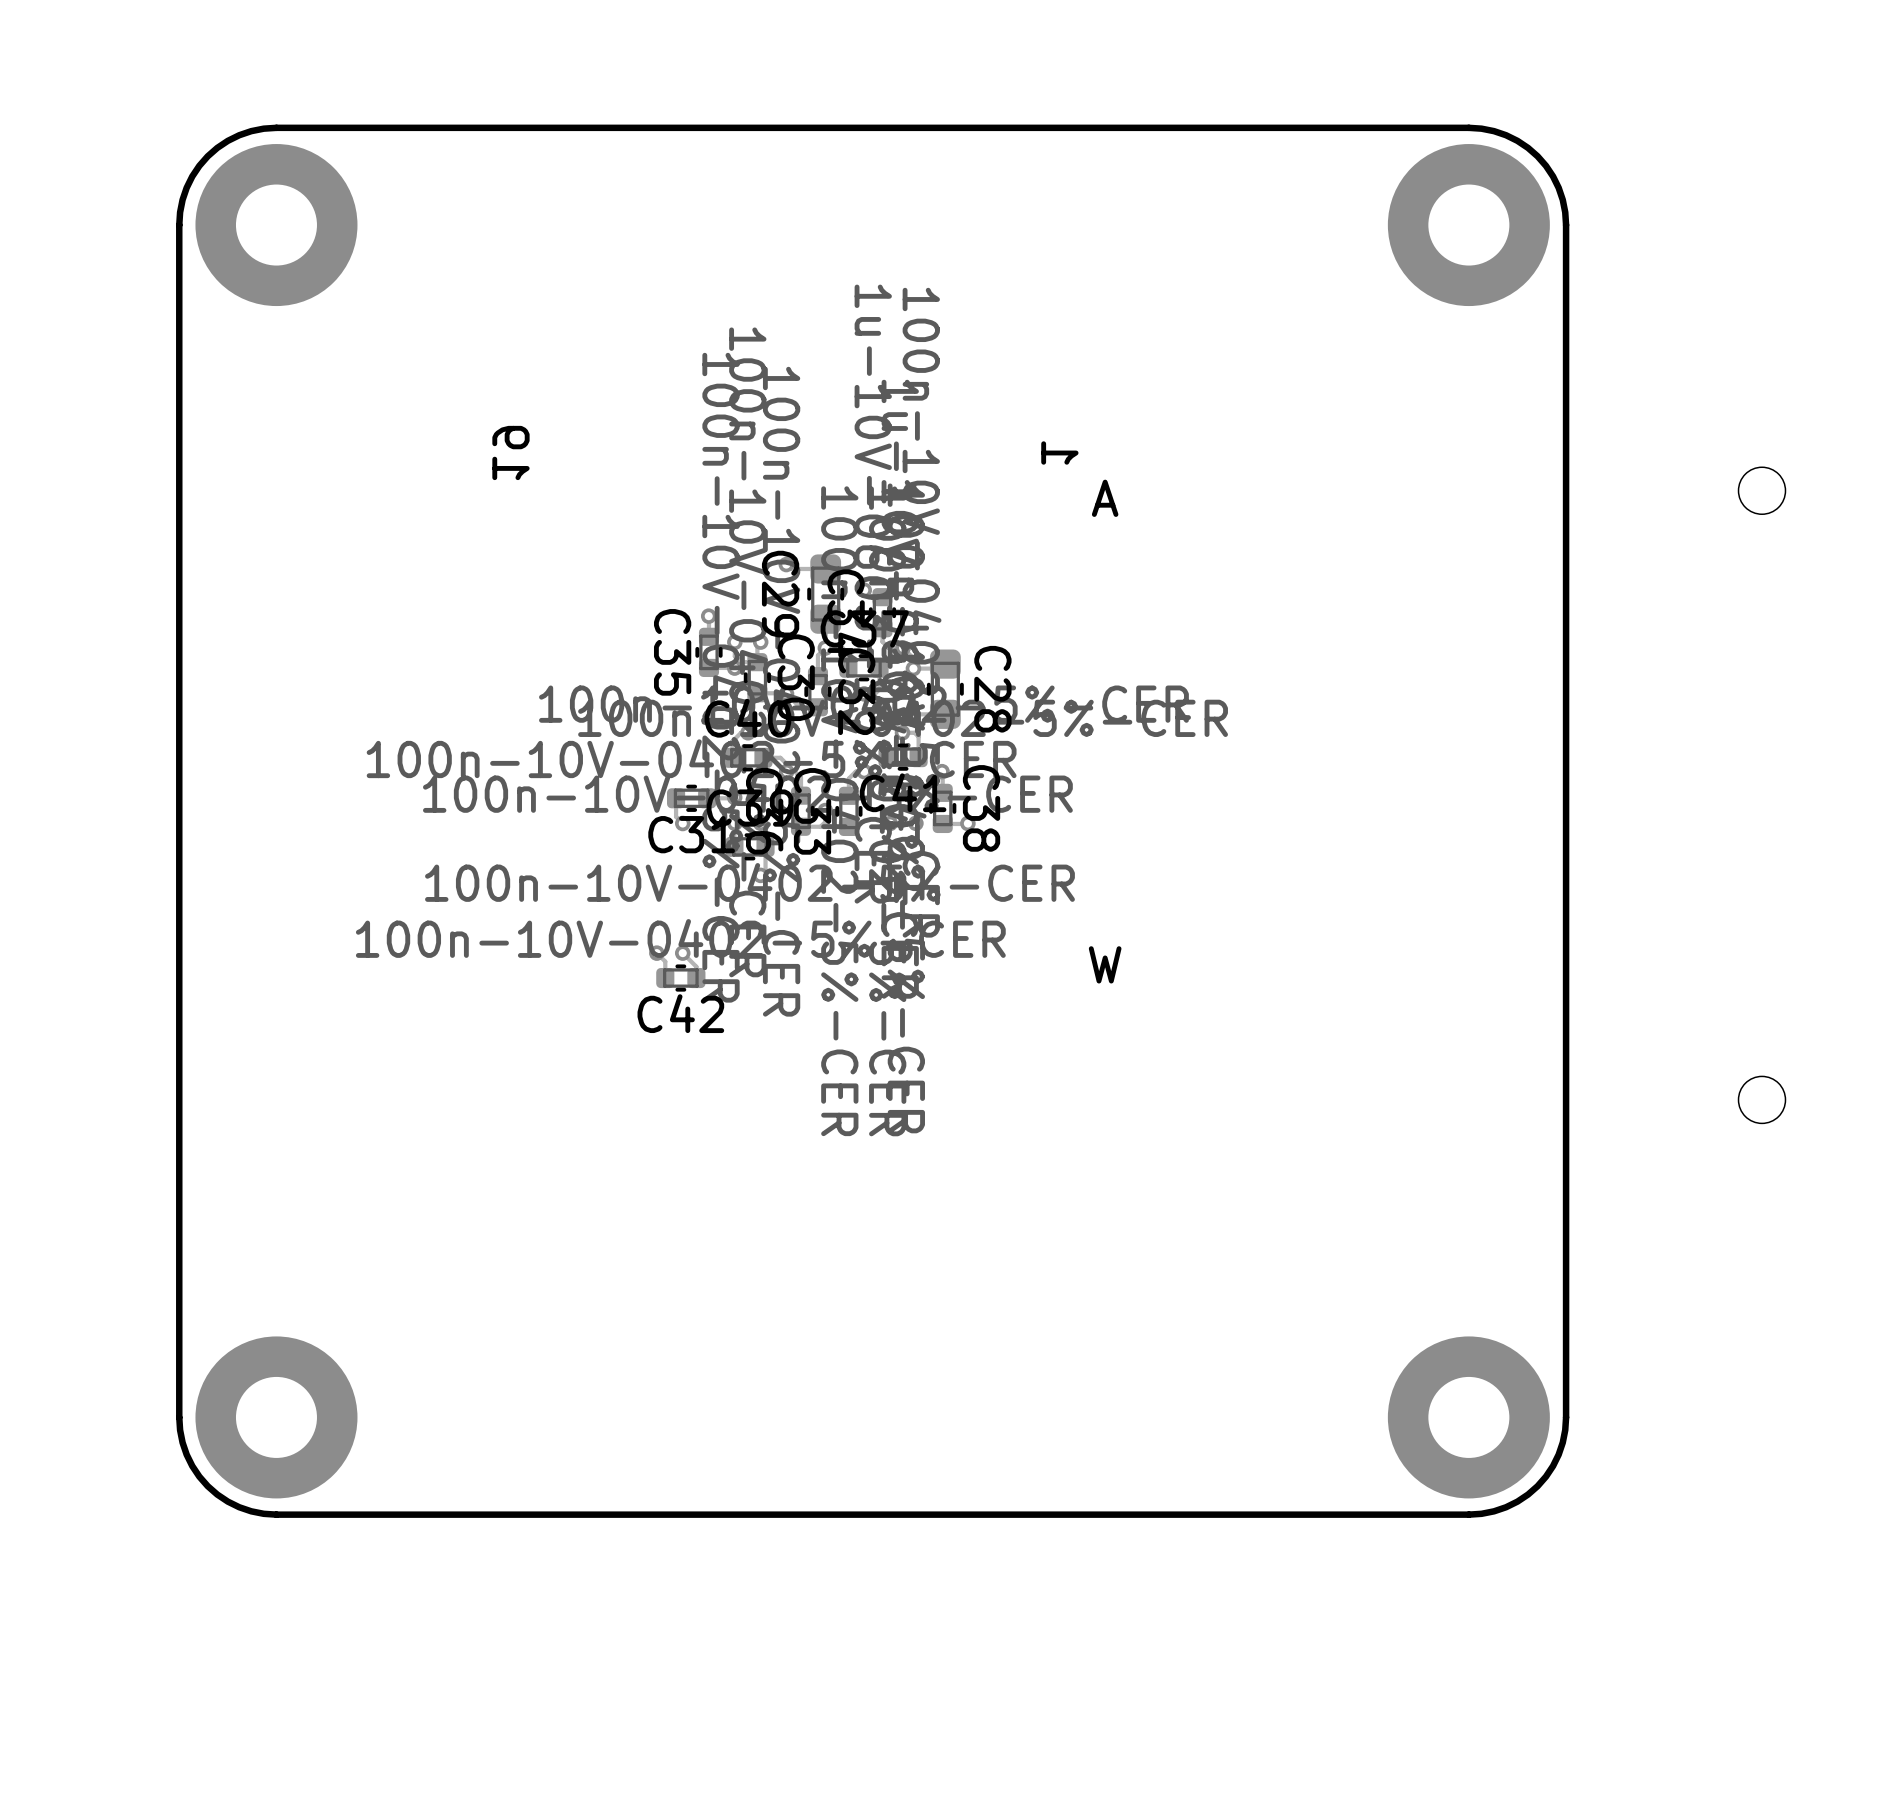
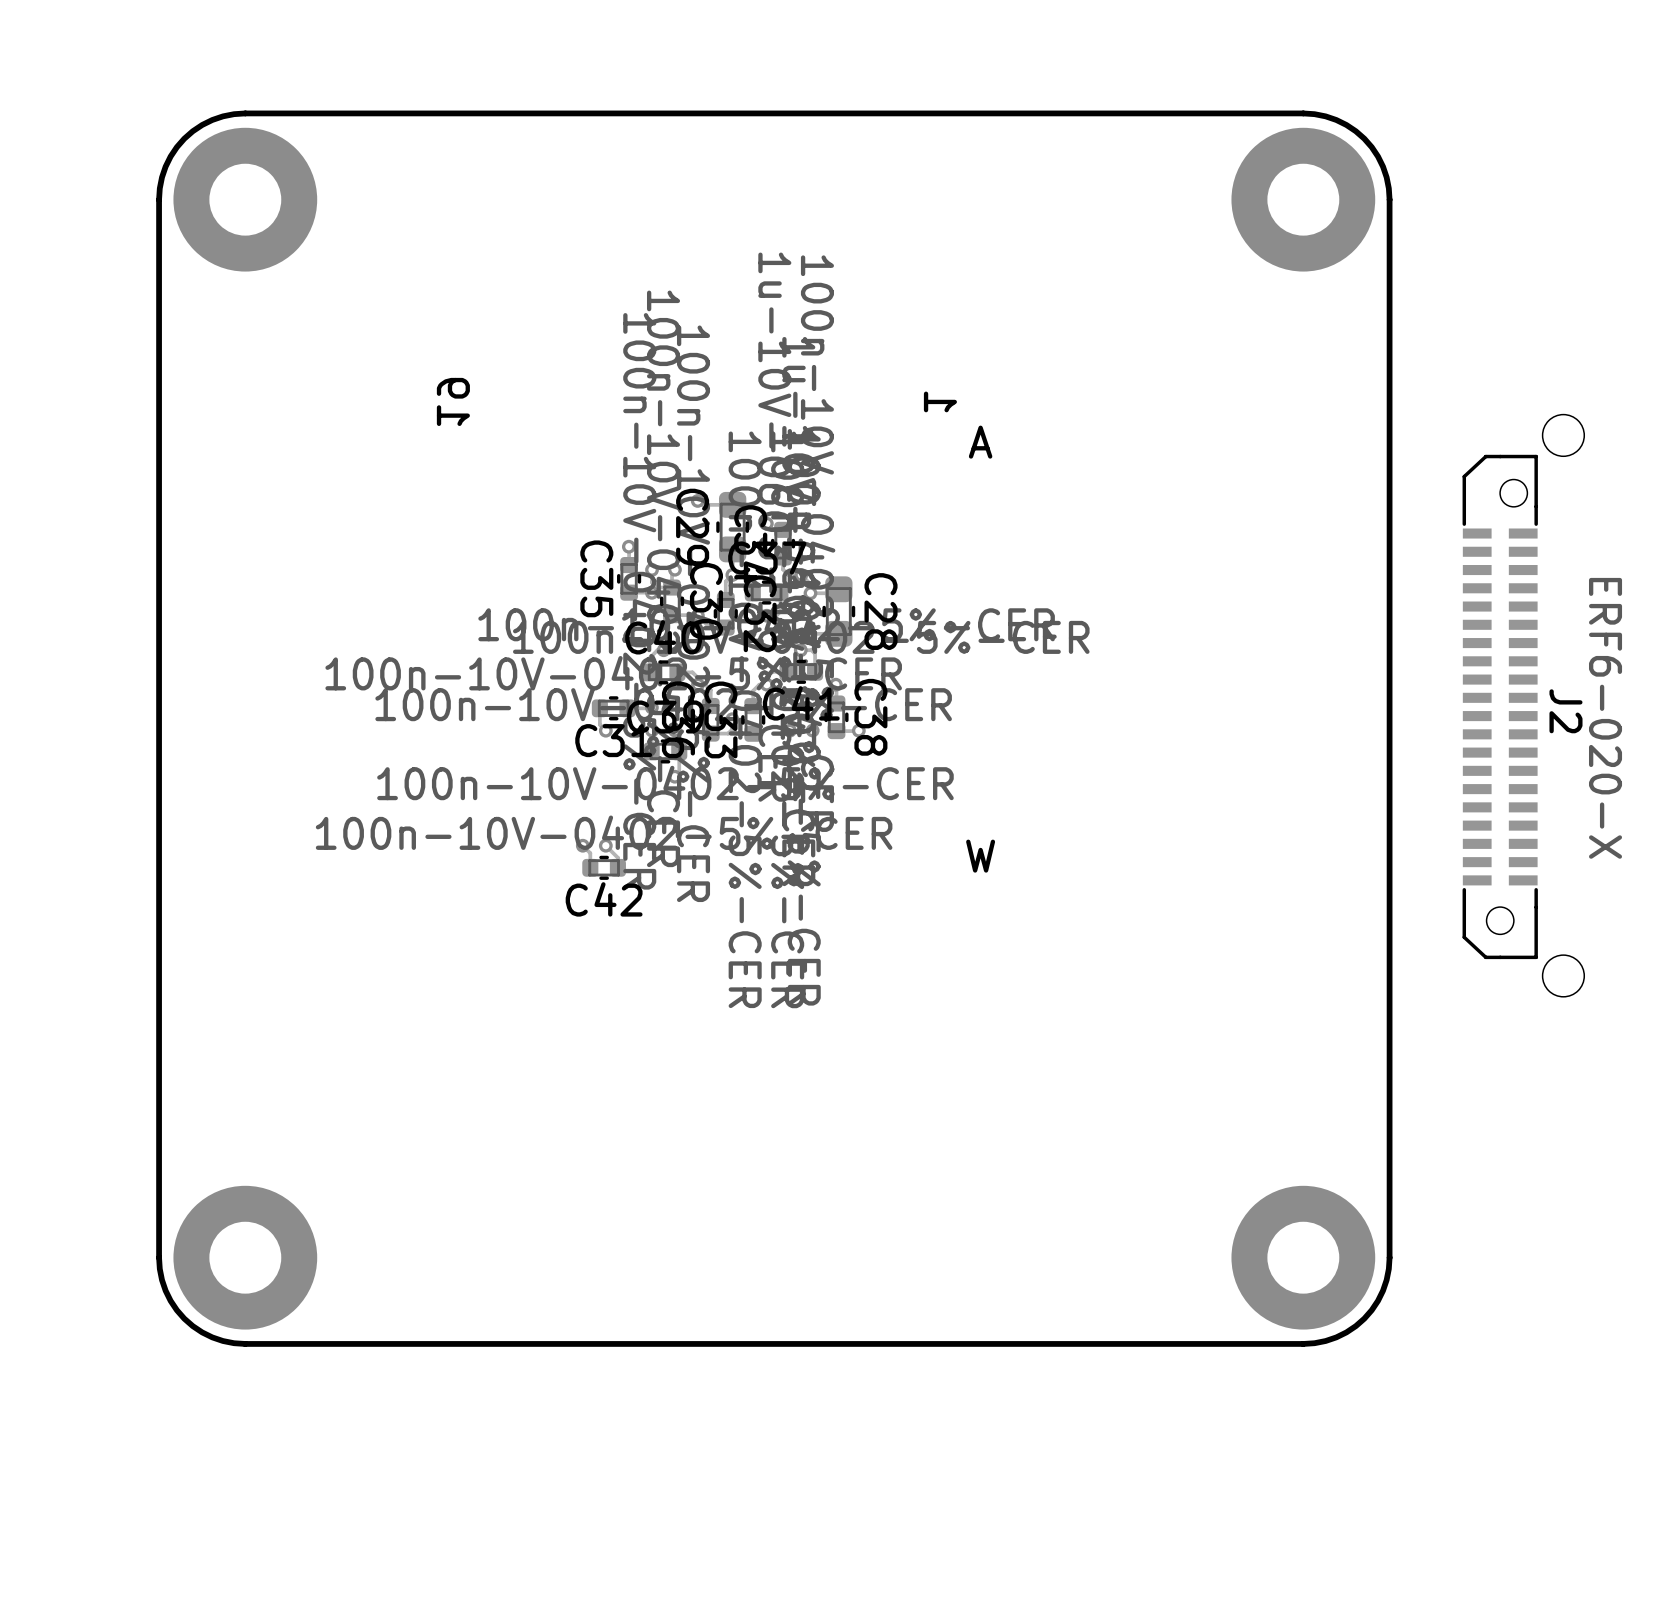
J2: none -> ERF6-020-X (1500, 706)

